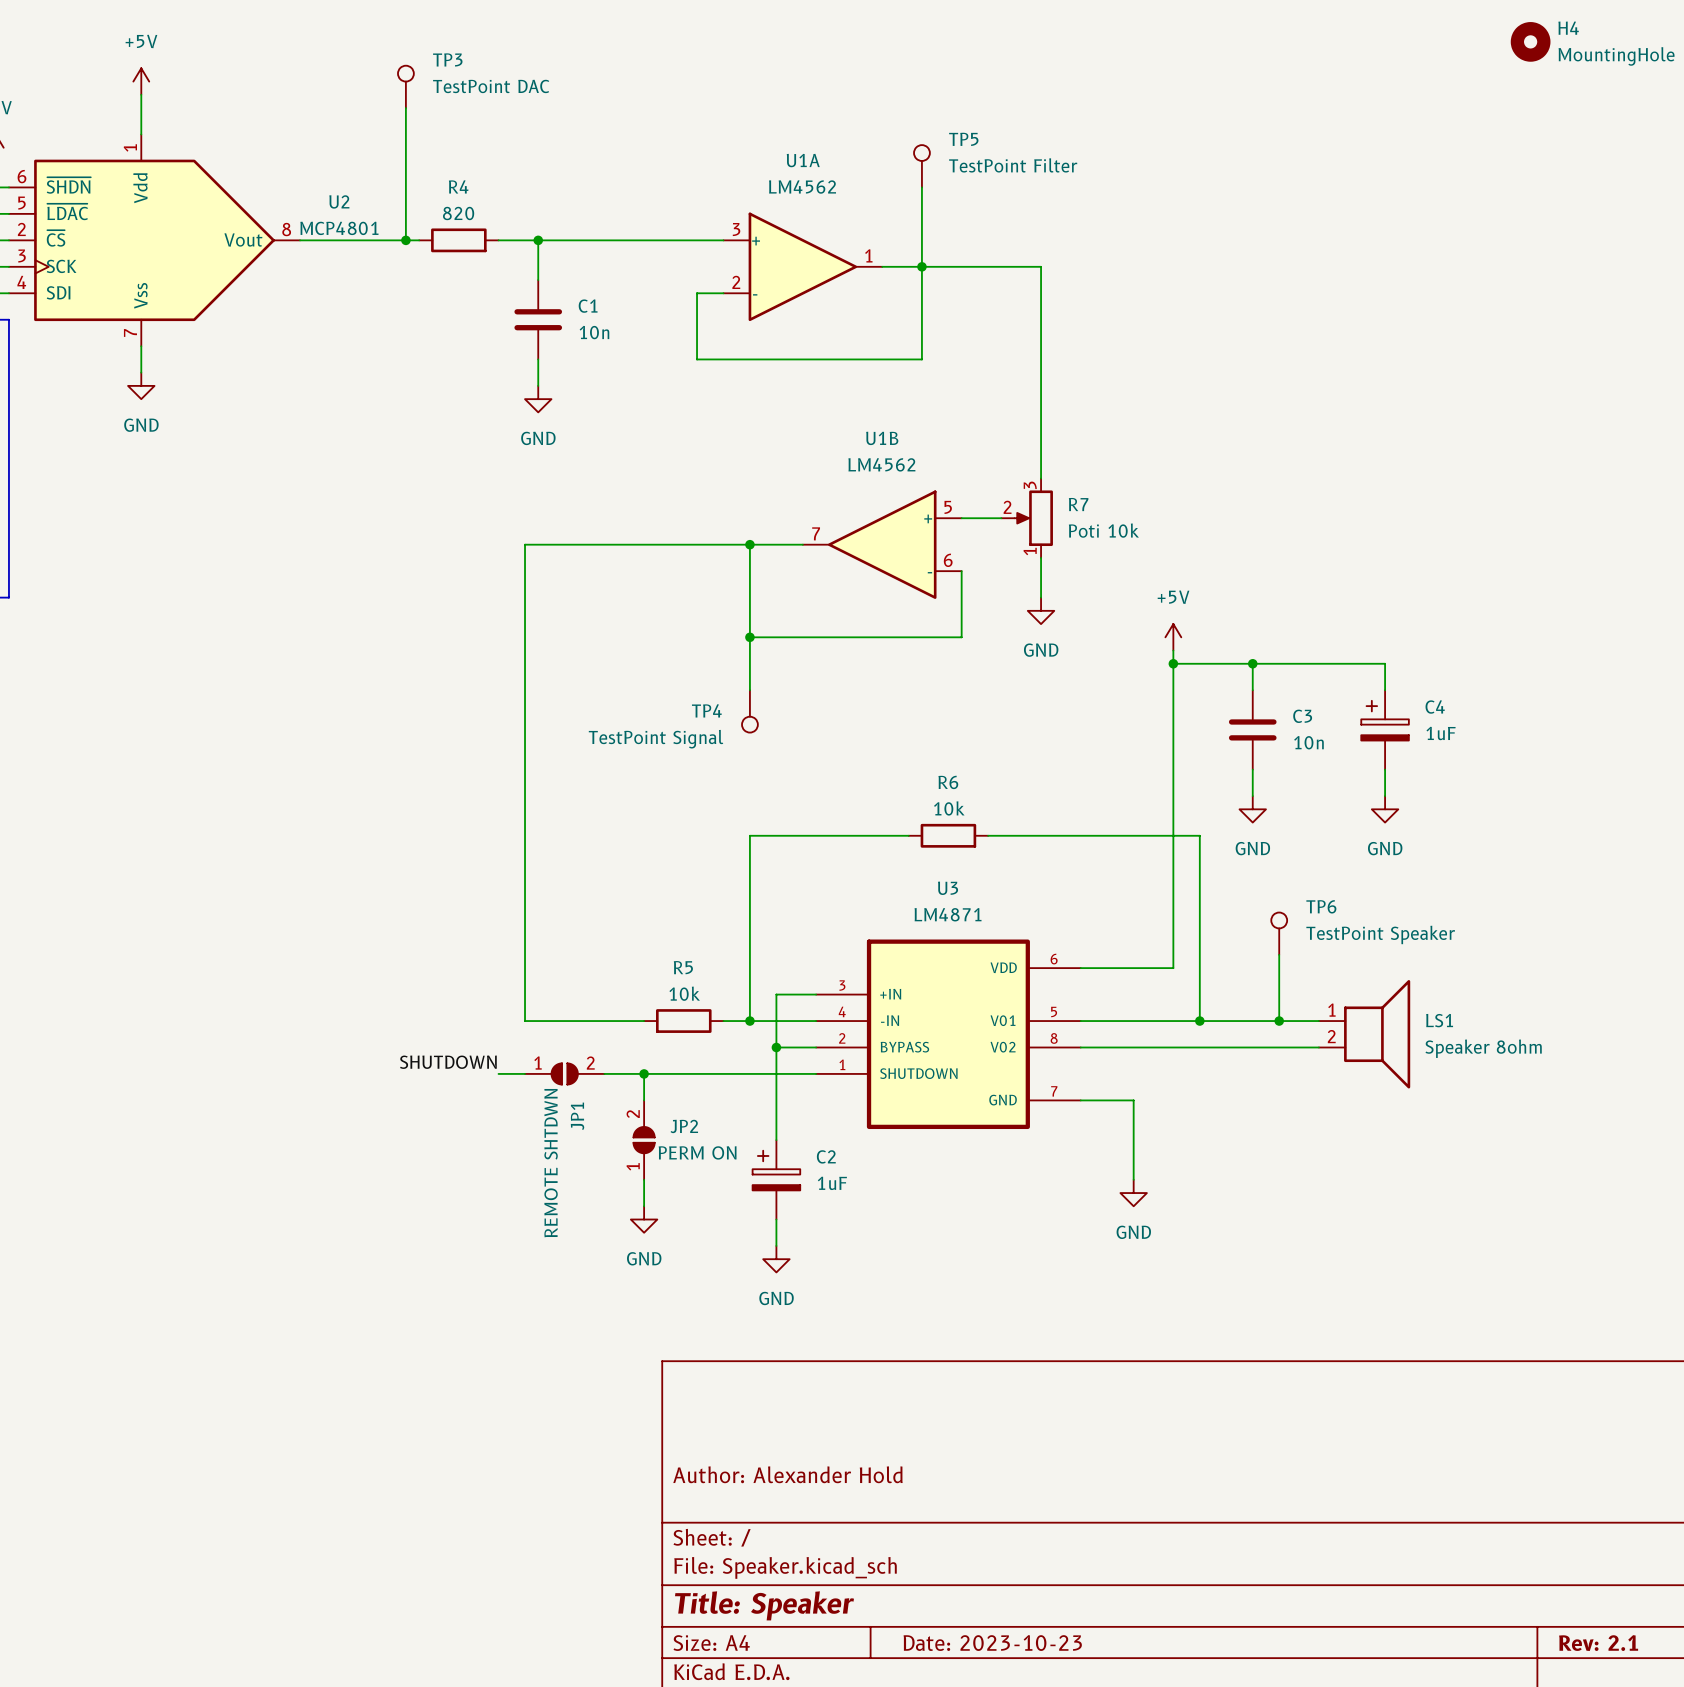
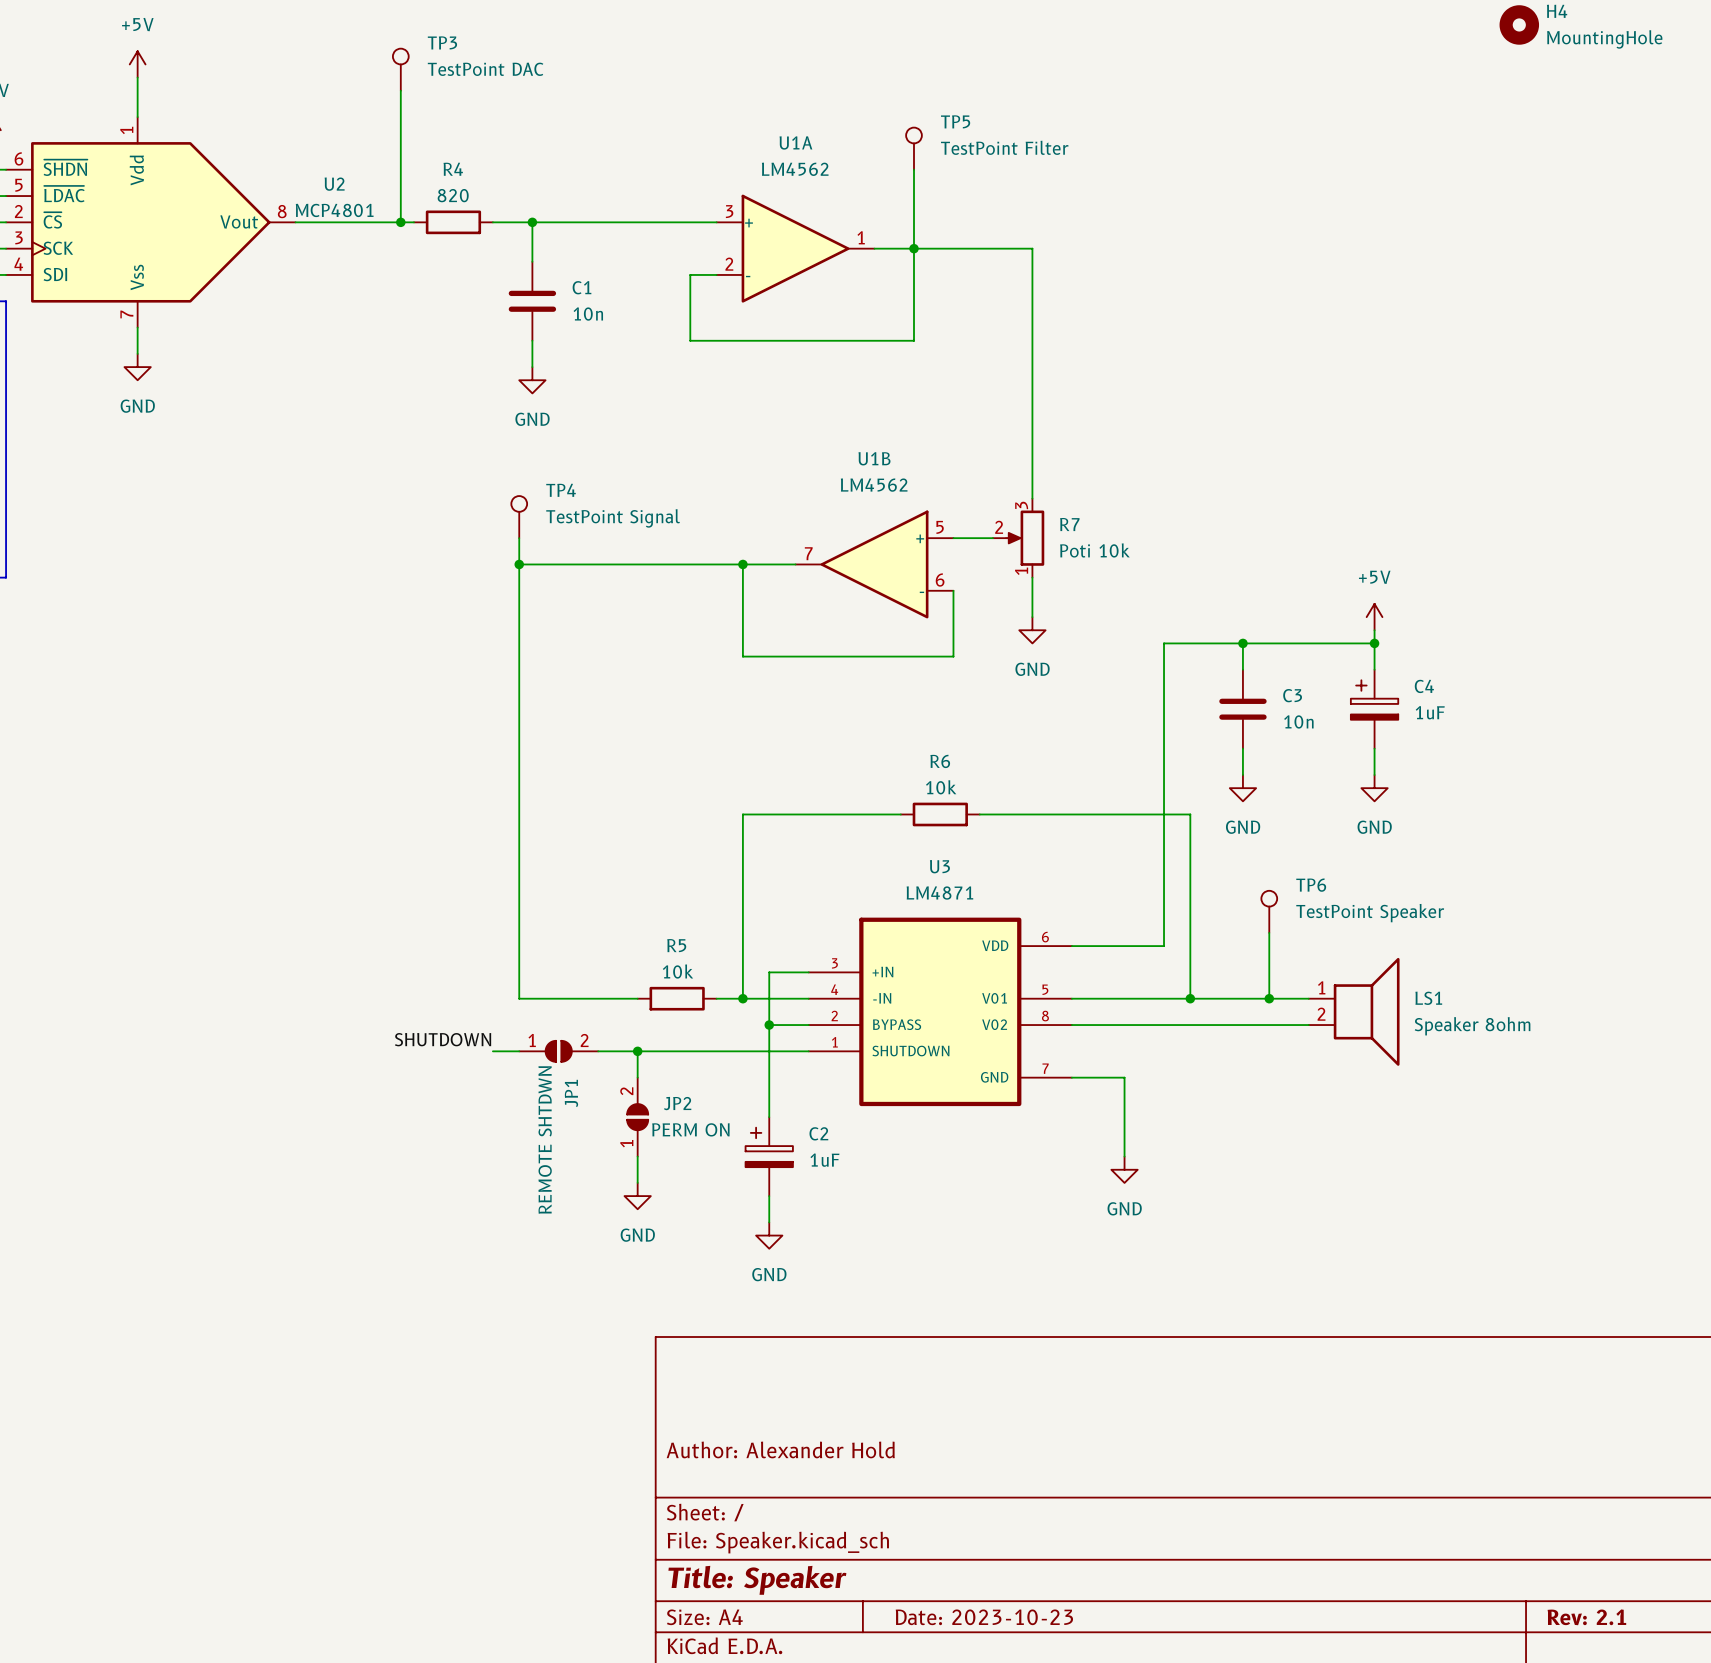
wire: (961, 518) (1001, 518) -> (953, 538) (992, 538)
R7 position: (1027, 518) -> (1018, 538)
wire: (749, 544) (749, 584) -> none
junction: (749, 544) -> none
wire: (802, 544) (525, 544) (525, 557) -> none
U1B position: (882, 544) -> (874, 564)
wire: (1041, 557) (1041, 597) -> (1032, 617) (1032, 577)
wire: (961, 571) (961, 610) -> (1032, 459) (1032, 498)
wire: none -> (519, 564) (795, 564)
junction: none -> (519, 564)
junction: none -> (742, 564)
power symbol position: GND (1041, 610) -> GND (1032, 630)
wire: (749, 637) (961, 637) -> (742, 656) (953, 656) (953, 617)
junction: (749, 637) -> none
power symbol position: +5V (1173, 637) -> +5V (1374, 617)
wire: (1173, 650) (1173, 663) -> (1374, 630) (1374, 643)
junction: (1173, 663) -> none
junction: none -> (1374, 643)
wire: (749, 677) (749, 690) -> none
TP4 name position: TP4 (706, 710) -> TP4 (561, 490)
TP4 position: (749, 711) -> (519, 517)
TP4 rotation: 0° (749, 724) -> 180° (519, 503)
TP4 value position: TestPoint Signal (656, 739) -> TestPoint Signal (613, 518)

